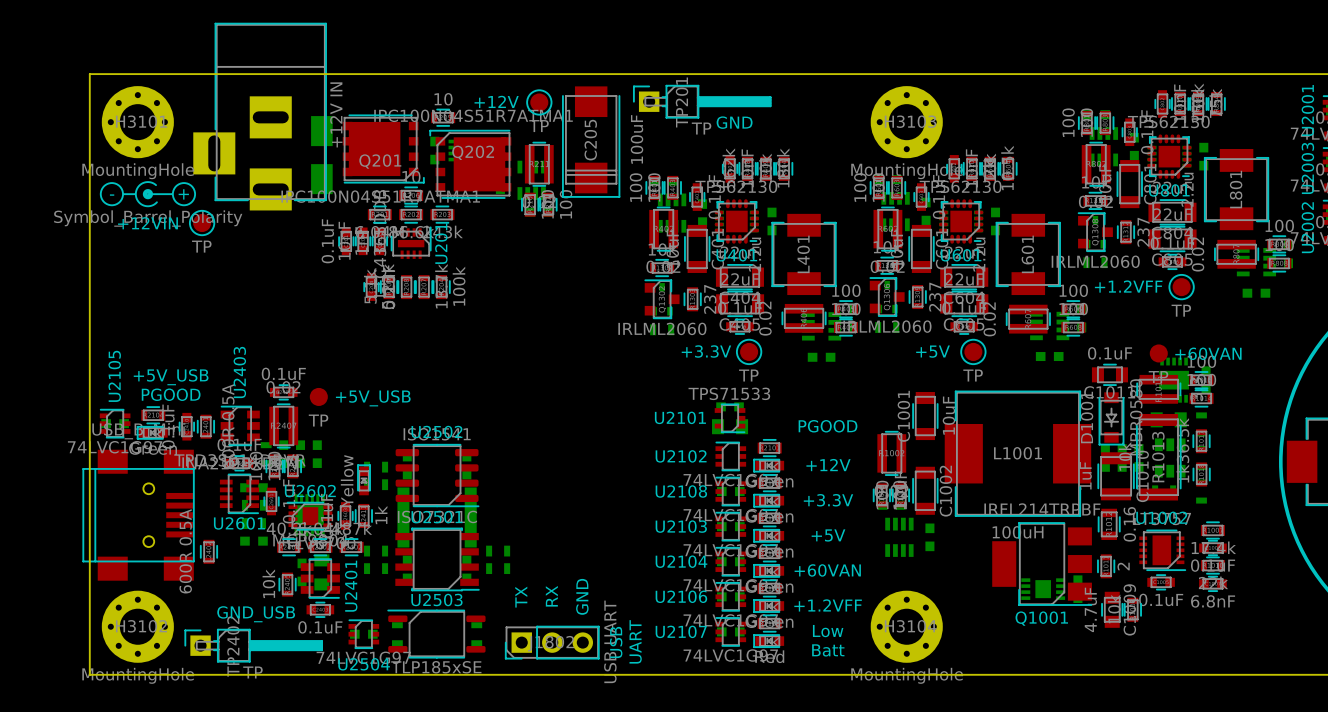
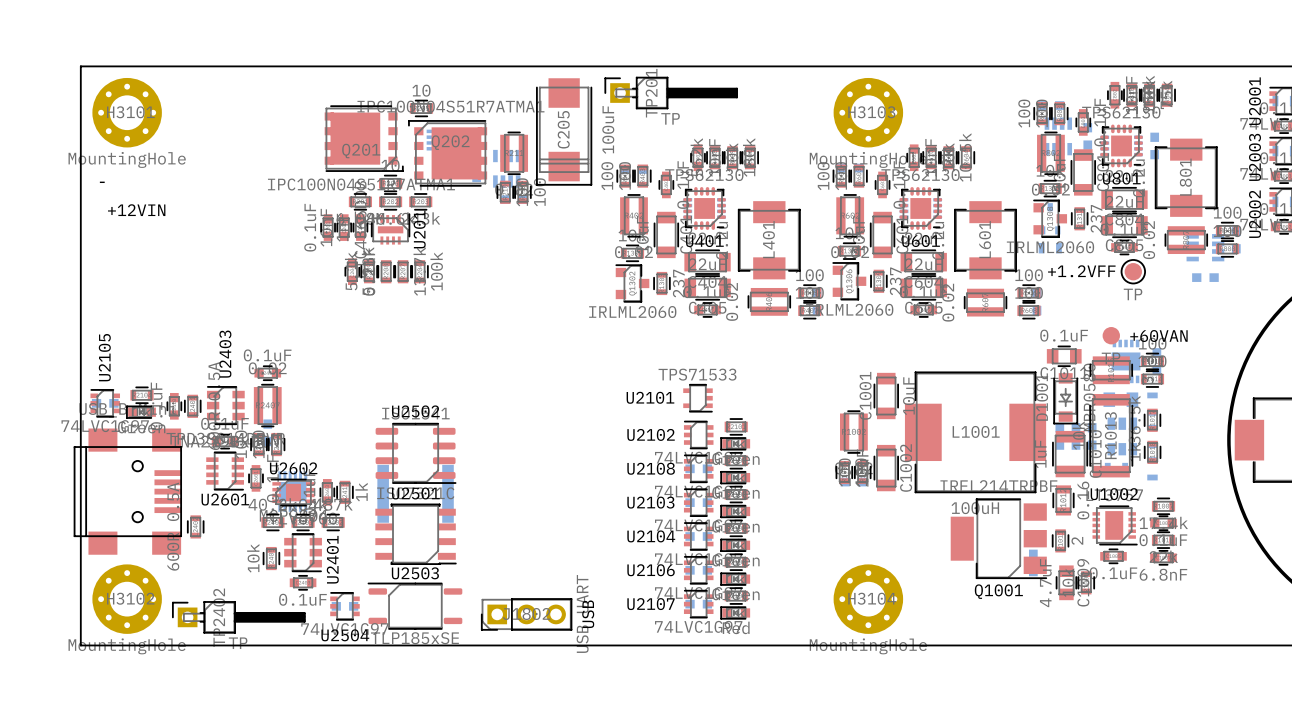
text: +12V (496, 101) -> none
part: TP (539, 102) -> none
part: +12V IN (260, 116) -> none
text: GND (734, 122) -> none
part: (434, 150) -> none
part: (321, 155) -> none
drawing: [99, 181, 196, 208] -> none
text: + (183, 194) -> none
part: (895, 211) -> none
part: (926, 211) -> none
part: (672, 213) -> none
part: (702, 213) -> none
part: (772, 221) -> none
part: (995, 221) -> none
part: TP (202, 223) -> none
part: (887, 297) -> none
part: (662, 299) -> none
part: (821, 326) -> none
part: (1049, 326) -> none
part: (887, 327) -> none
part: (662, 329) -> none
text: +3.3V (706, 351) -> none
part: TP (749, 351) -> none
text: +5V (933, 351) -> none
part: TP (973, 351) -> none
part: (1049, 356) -> none
part: (821, 357) -> none
text: +5V_USB (171, 377) -> none
text: PGOOD (171, 394) -> none
part: TP (318, 396) -> none
text: +5V_USB (373, 398) -> none
part: (730, 406) -> none
part: (730, 426) -> none
text: PGOOD (828, 426) -> none
part: (266, 454) -> none
part: (300, 454) -> none
part: (317, 454) -> none
part: (407, 465) -> none
part: (466, 465) -> none
text: +12V (828, 465) -> none
part: (376, 467) -> none
part: Yellow (364, 479) -> none
part: (376, 484) -> none
part: (253, 487) -> none
text: +3.3V (828, 500) -> none
part: (253, 505) -> none
part: (253, 523) -> none
text: +5V (828, 535) -> none
part: (899, 537) -> none
part: (929, 537) -> none
part: (253, 541) -> none
part: (376, 551) -> none
part: (498, 551) -> none
part: (376, 568) -> none
part: (498, 568) -> none
part: (407, 569) -> none
part: (466, 569) -> none
text: +60VAN (827, 570) -> none
part: (302, 572) -> none
part: (321, 572) -> none
part: (1043, 589) -> none
text: RX (551, 596) -> none
text: GND (582, 596) -> none
text: TX (521, 597) -> none
text: +1.2VFF (828, 605) -> none
text: GND_USB (256, 614) -> none
text: Low (828, 631) -> none
part: (397, 634) -> none
part: (476, 634) -> none
text: UART (635, 641) -> none
text: Batt (828, 650) -> none

